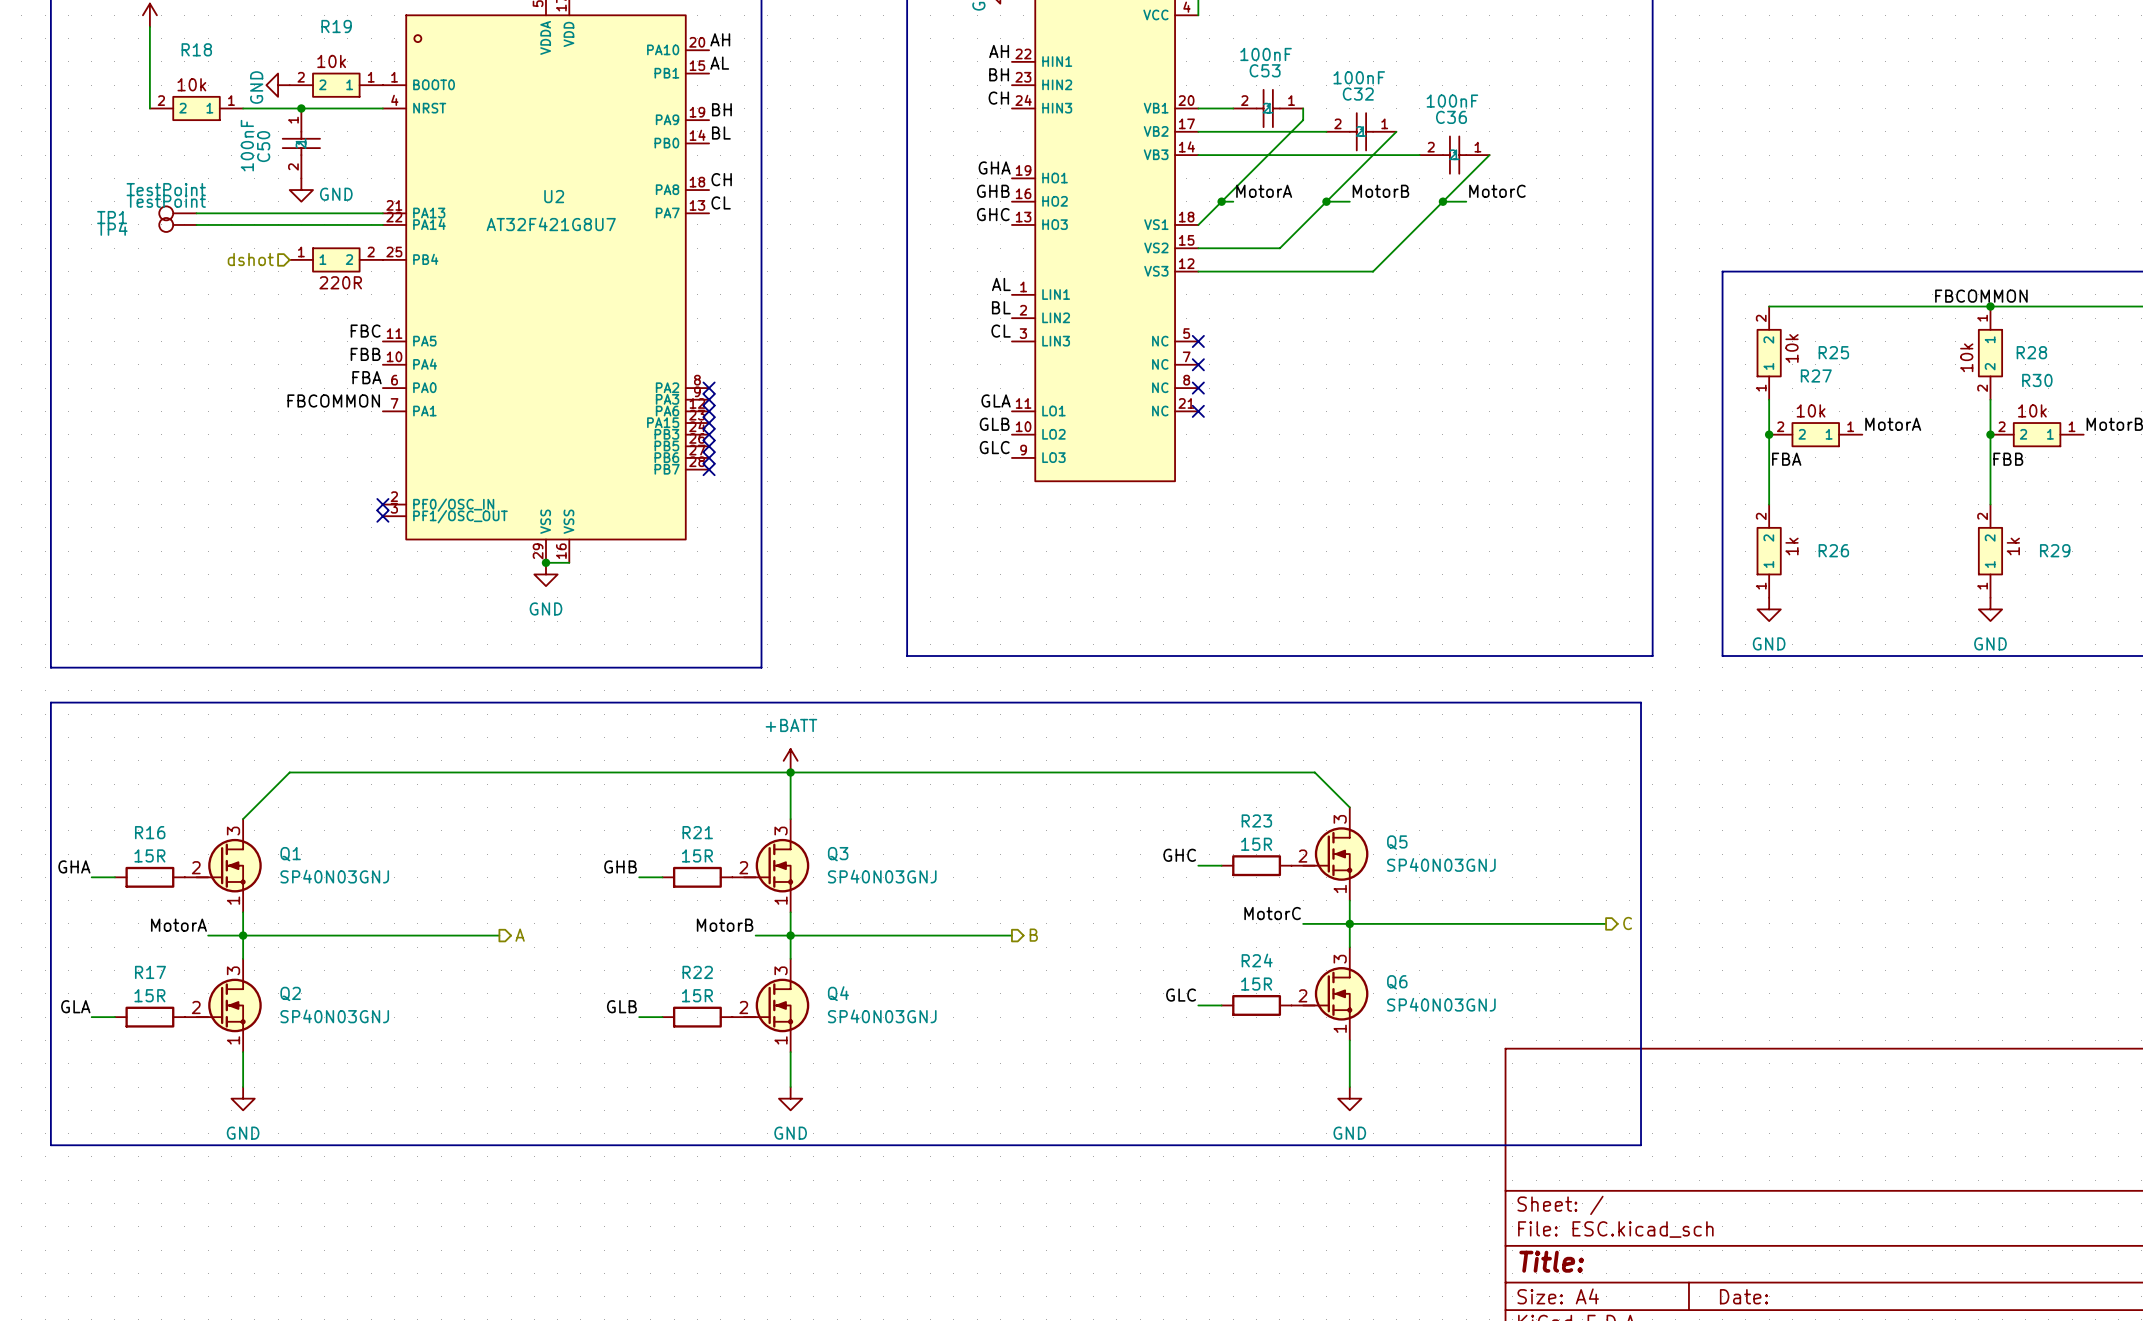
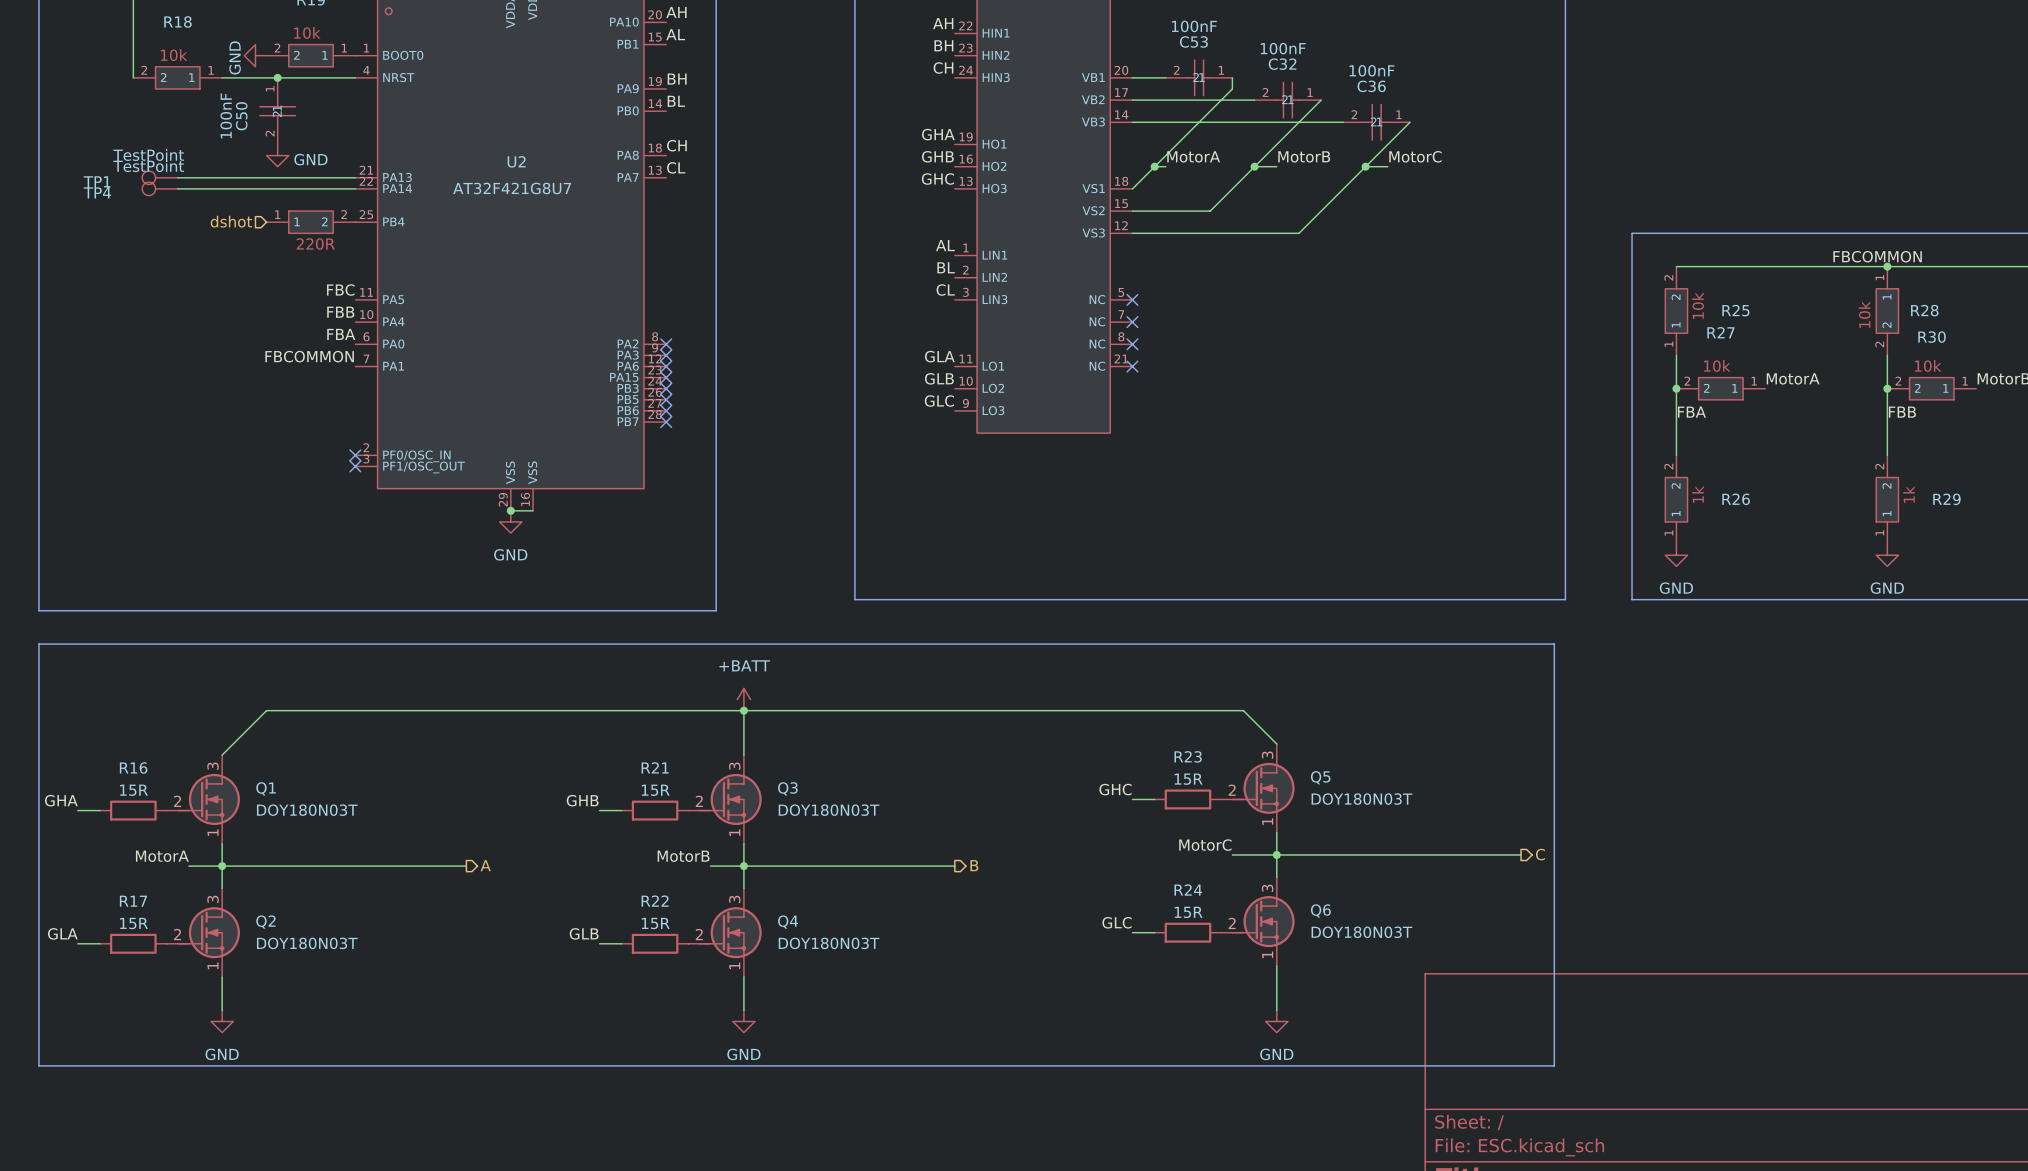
Q5 value: SP40N03GNJ (1441, 864) -> DOY180N03T (1361, 799)
Q1 value: SP40N03GNJ (334, 876) -> DOY180N03T (307, 810)
Q3 value: SP40N03GNJ (882, 876) -> DOY180N03T (829, 810)
Q6 value: SP40N03GNJ (1441, 1004) -> DOY180N03T (1361, 932)
Q2 value: SP40N03GNJ (334, 1016) -> DOY180N03T (307, 943)
Q4 value: SP40N03GNJ (882, 1016) -> DOY180N03T (829, 943)

